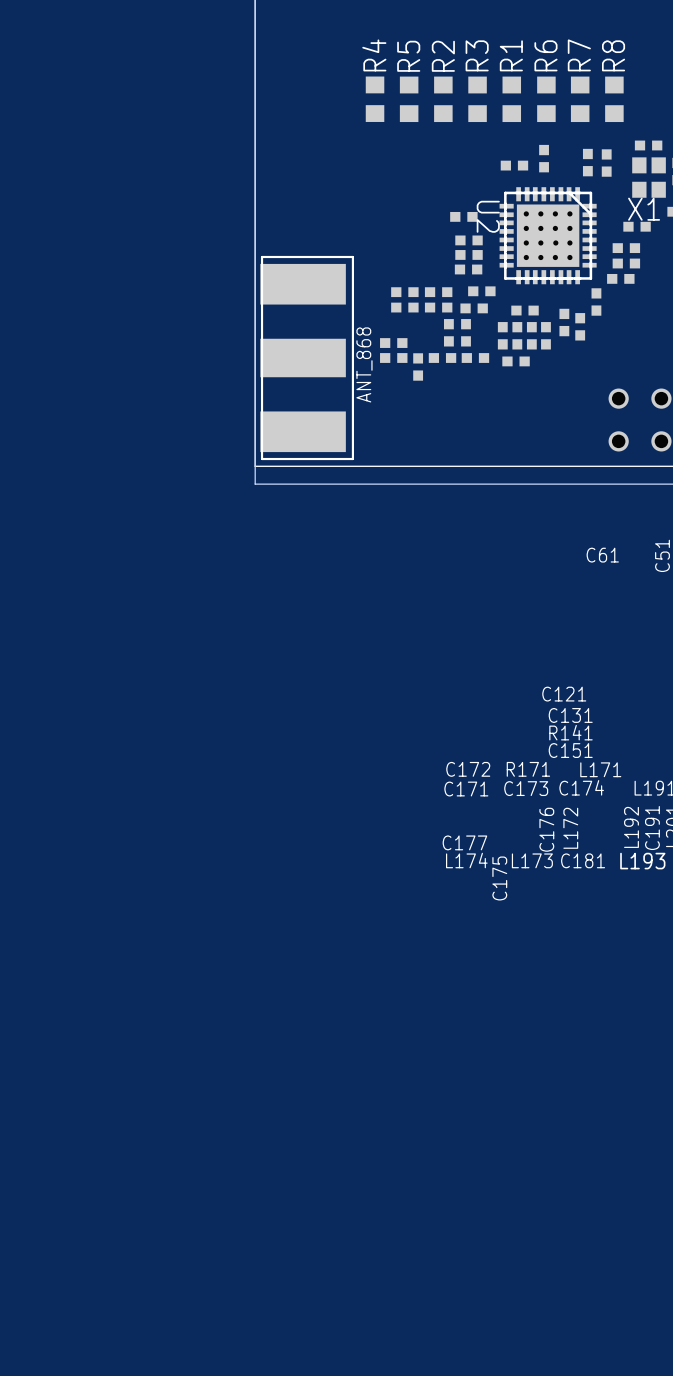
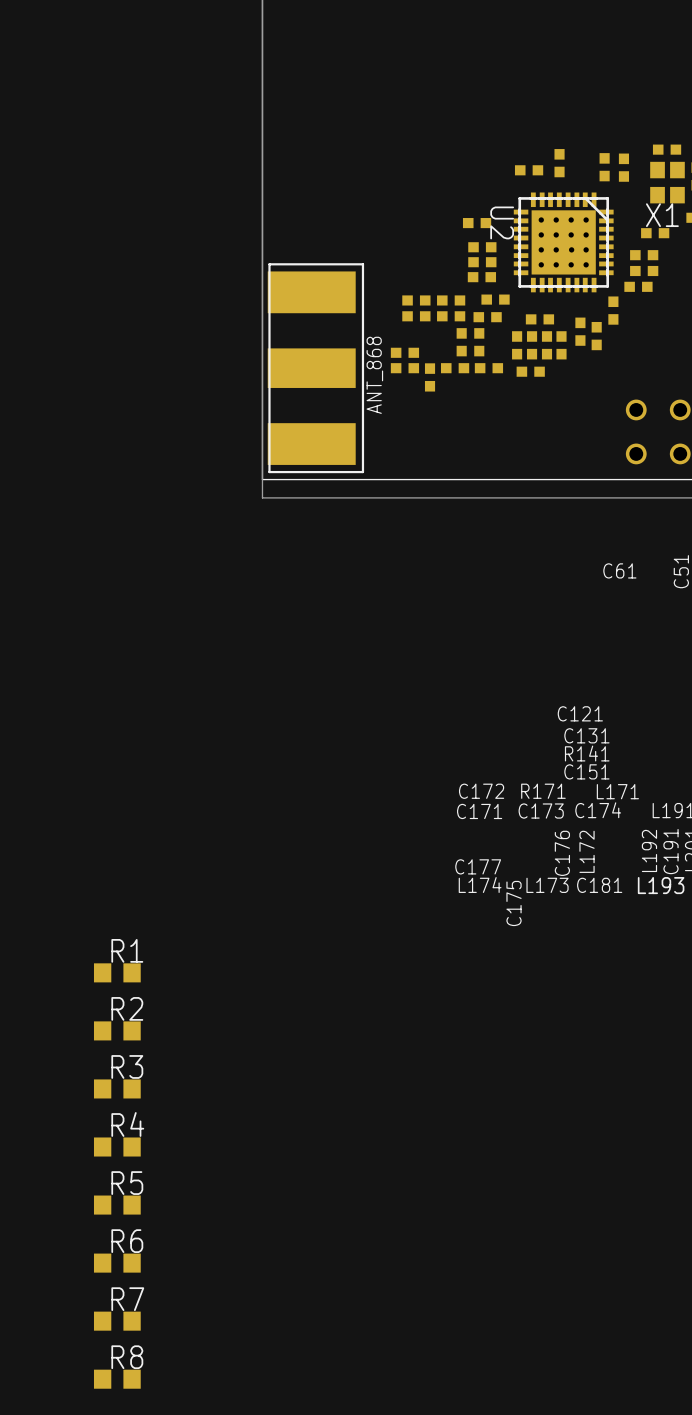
R4 rotation: 0° (375, 99) -> 90° clockwise (117, 1147)
R4 position: (375, 99) -> (117, 1147)
R5 rotation: 0° (409, 99) -> 90° clockwise (117, 1205)
R5 position: (409, 99) -> (117, 1205)
R2 rotation: 0° (443, 99) -> 90° clockwise (117, 1030)
R2 position: (443, 99) -> (117, 1030)
R3 rotation: 0° (477, 99) -> 90° clockwise (117, 1088)
R3 position: (477, 99) -> (117, 1088)
R1 rotation: 0° (511, 99) -> 90° clockwise (117, 972)
R1 position: (511, 99) -> (117, 972)
R6 rotation: 0° (546, 99) -> 90° clockwise (117, 1263)
R6 position: (546, 99) -> (117, 1263)
R7 rotation: 0° (580, 99) -> 90° clockwise (117, 1321)
R7 position: (580, 99) -> (117, 1321)
R8 rotation: 0° (614, 99) -> 90° clockwise (117, 1379)
R8 position: (614, 99) -> (117, 1379)

